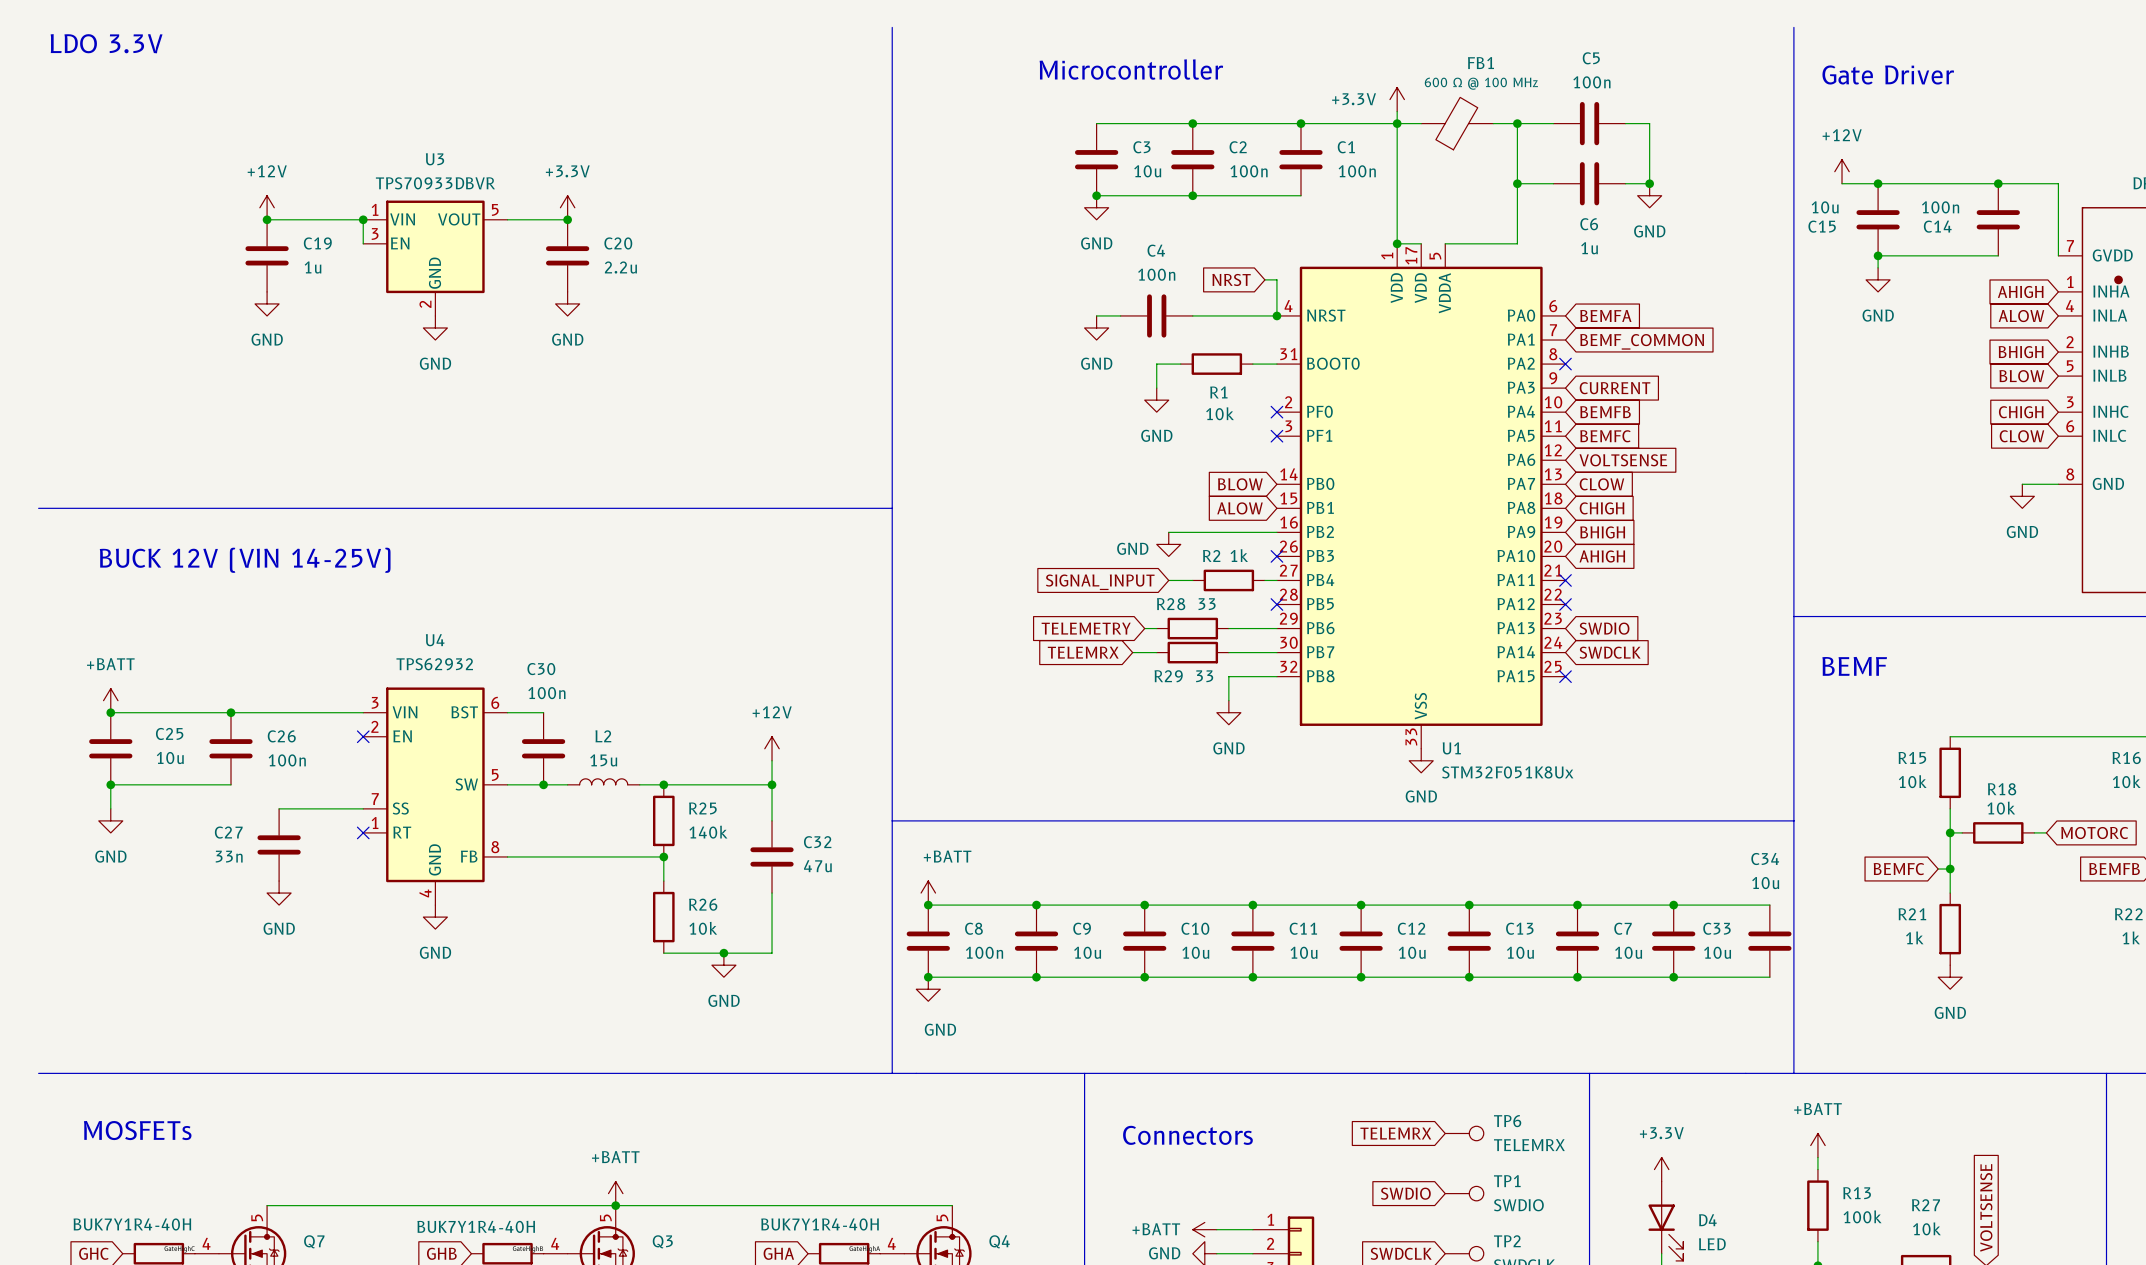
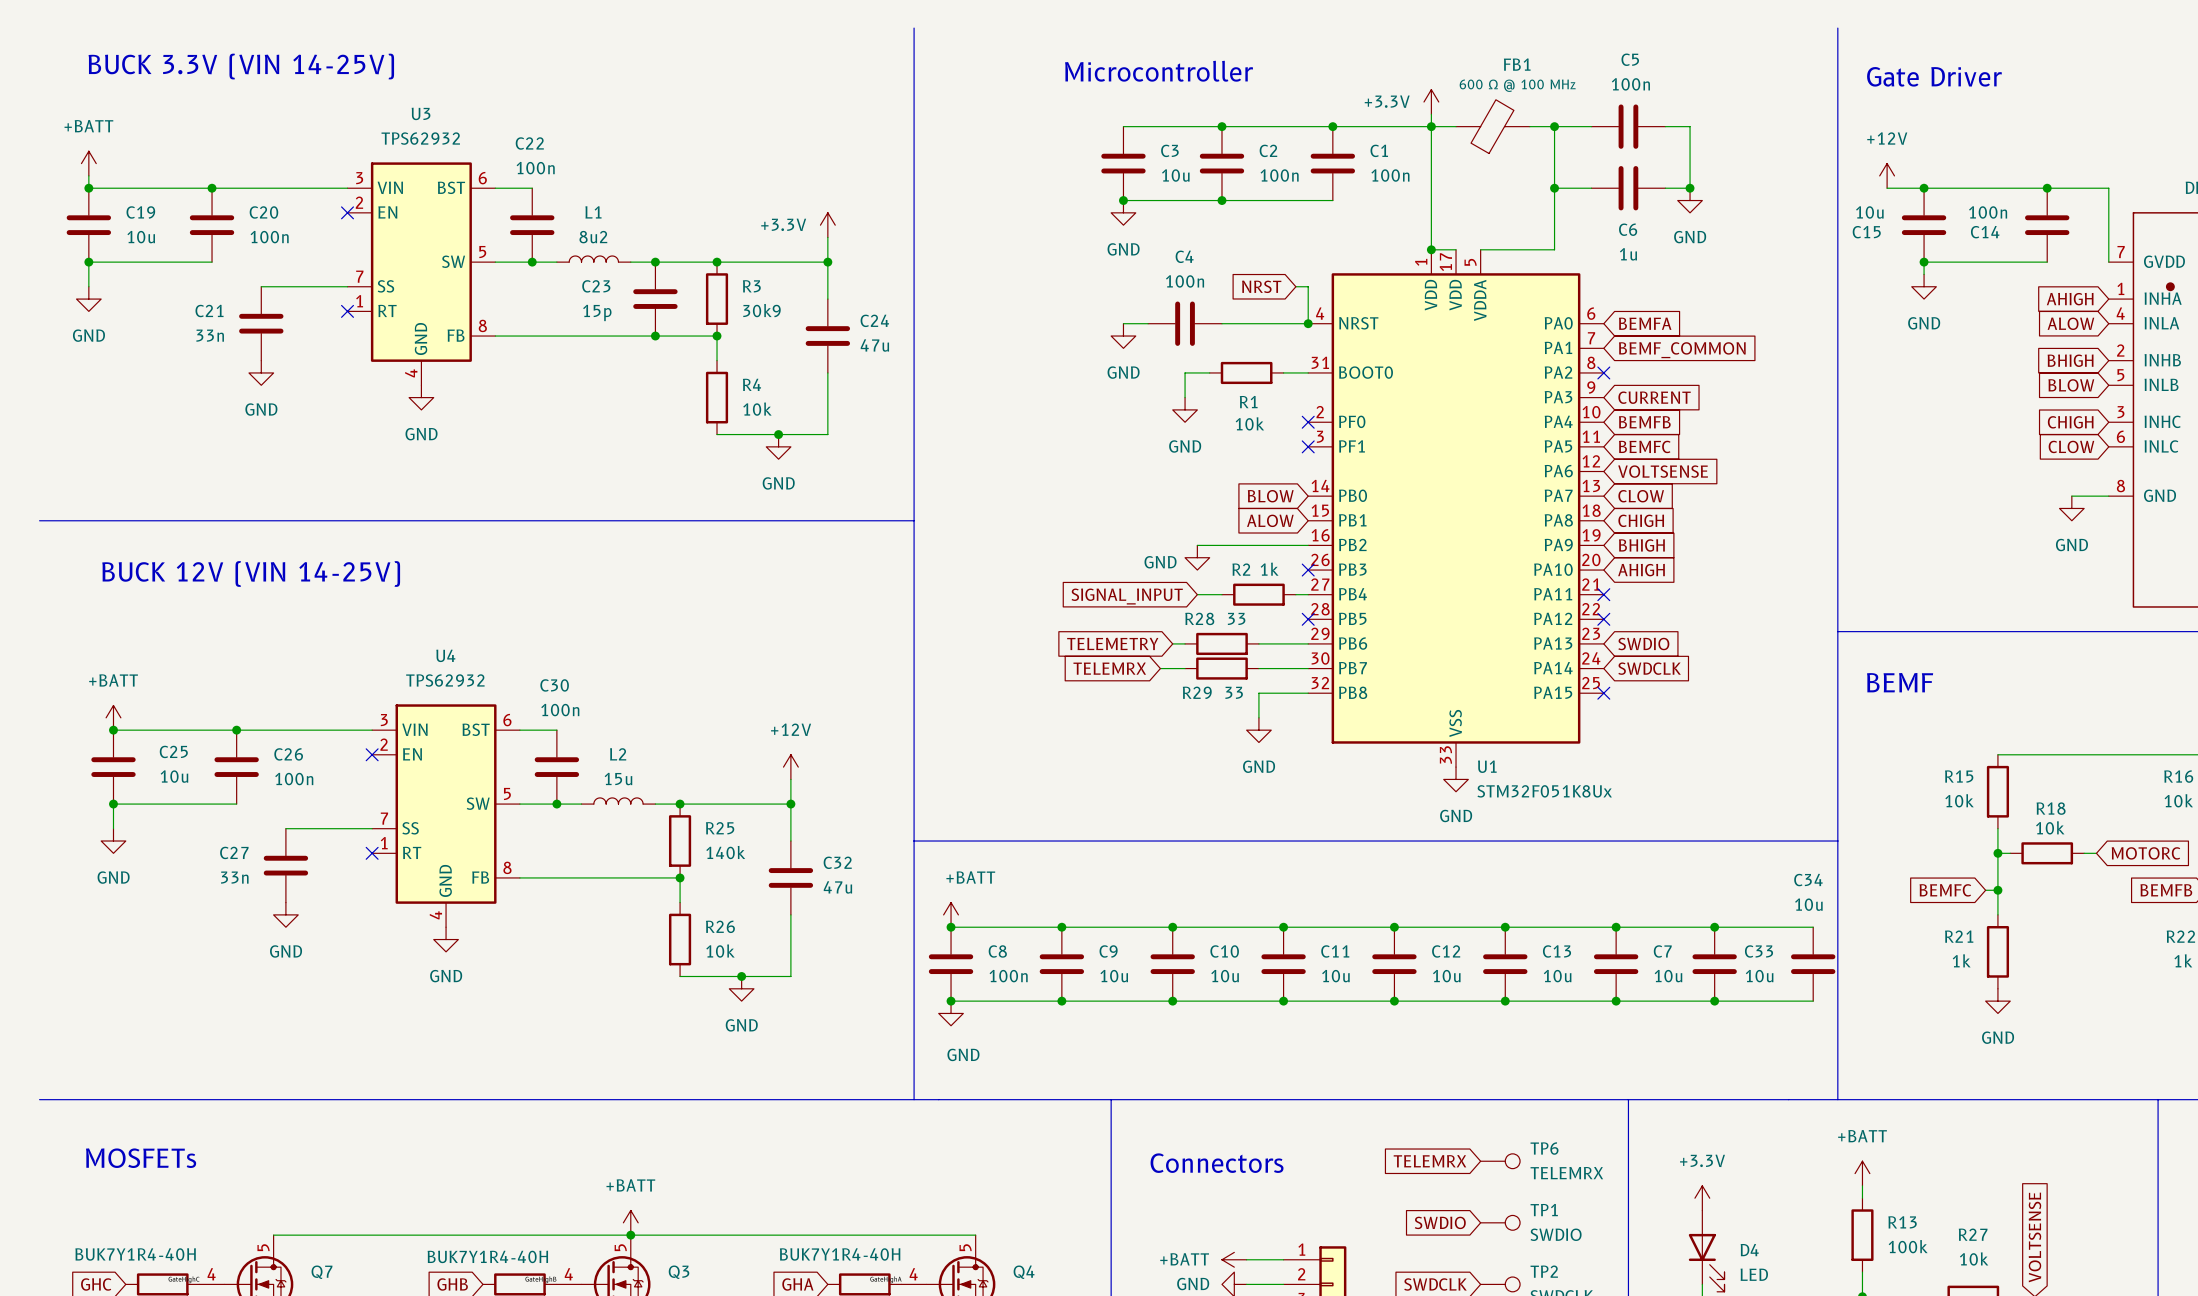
text: LDO 3.3V (106, 43) -> none
text: none -> BUCK 3.3V (VIN 14-25V) (241, 66)
power symbol: none -> +BATT (88, 163)
U3 name position: U3 (435, 159) -> U3 (421, 113)
wire: none -> (88, 175) (88, 188) (347, 188)
junction: none -> (88, 188)
junction: none -> (212, 188)
U3 value: TPS70933DBVR (435, 183) -> TPS62932 (420, 138)
wire: none -> (495, 188) (532, 188)
U3 symbol: [363, 200, 508, 316] -> [347, 162, 496, 386]
power symbol: +12V (267, 207) -> none
no-connect mark: none -> (347, 212)
power symbol: +3.3V (567, 207) -> none
wire: (267, 219) (363, 219) (363, 243) -> none
junction: (267, 219) -> none
junction: (363, 219) -> none
wire: (507, 219) (567, 219) -> (495, 262) (556, 262)
C22: none -> 100n (532, 225)
junction: (567, 219) -> none
power symbol: none -> +3.3V (827, 225)
wire: none -> (827, 237) (827, 299)
L1: none -> 8u2 (593, 259)
junction: none -> (88, 262)
wire: none -> (212, 262) (88, 262) (88, 286)
C19 position: (267, 255) -> (88, 225)
junction: none -> (532, 262)
C20 position: (567, 255) -> (212, 225)
wire: none -> (630, 262) (827, 262)
junction: none -> (655, 262)
junction: none -> (717, 262)
junction: none -> (827, 262)
C19 value: 1u (313, 267) -> 10u (141, 237)
C20 value: 2.2u (620, 267) -> 100n (269, 237)
wire: none -> (261, 286) (347, 286)
power symbol: none -> GND (88, 299)
C23: none -> 15p (655, 299)
R3: none -> 30k9 (717, 299)
power symbol position: GND (267, 303) -> GND (261, 372)
no-connect mark: none -> (347, 311)
power symbol: GND (567, 303) -> none
C21: none -> 33n (261, 323)
power symbol position: GND (435, 327) -> GND (421, 397)
wire: none -> (495, 336) (717, 336) (717, 360)
junction: none -> (655, 336)
junction: none -> (717, 336)
C24: none -> 47u (827, 336)
wire: none -> (827, 372) (827, 434) (717, 434)
R4: none -> 10k (717, 397)
junction: none -> (778, 434)
power symbol: none -> GND (778, 446)

